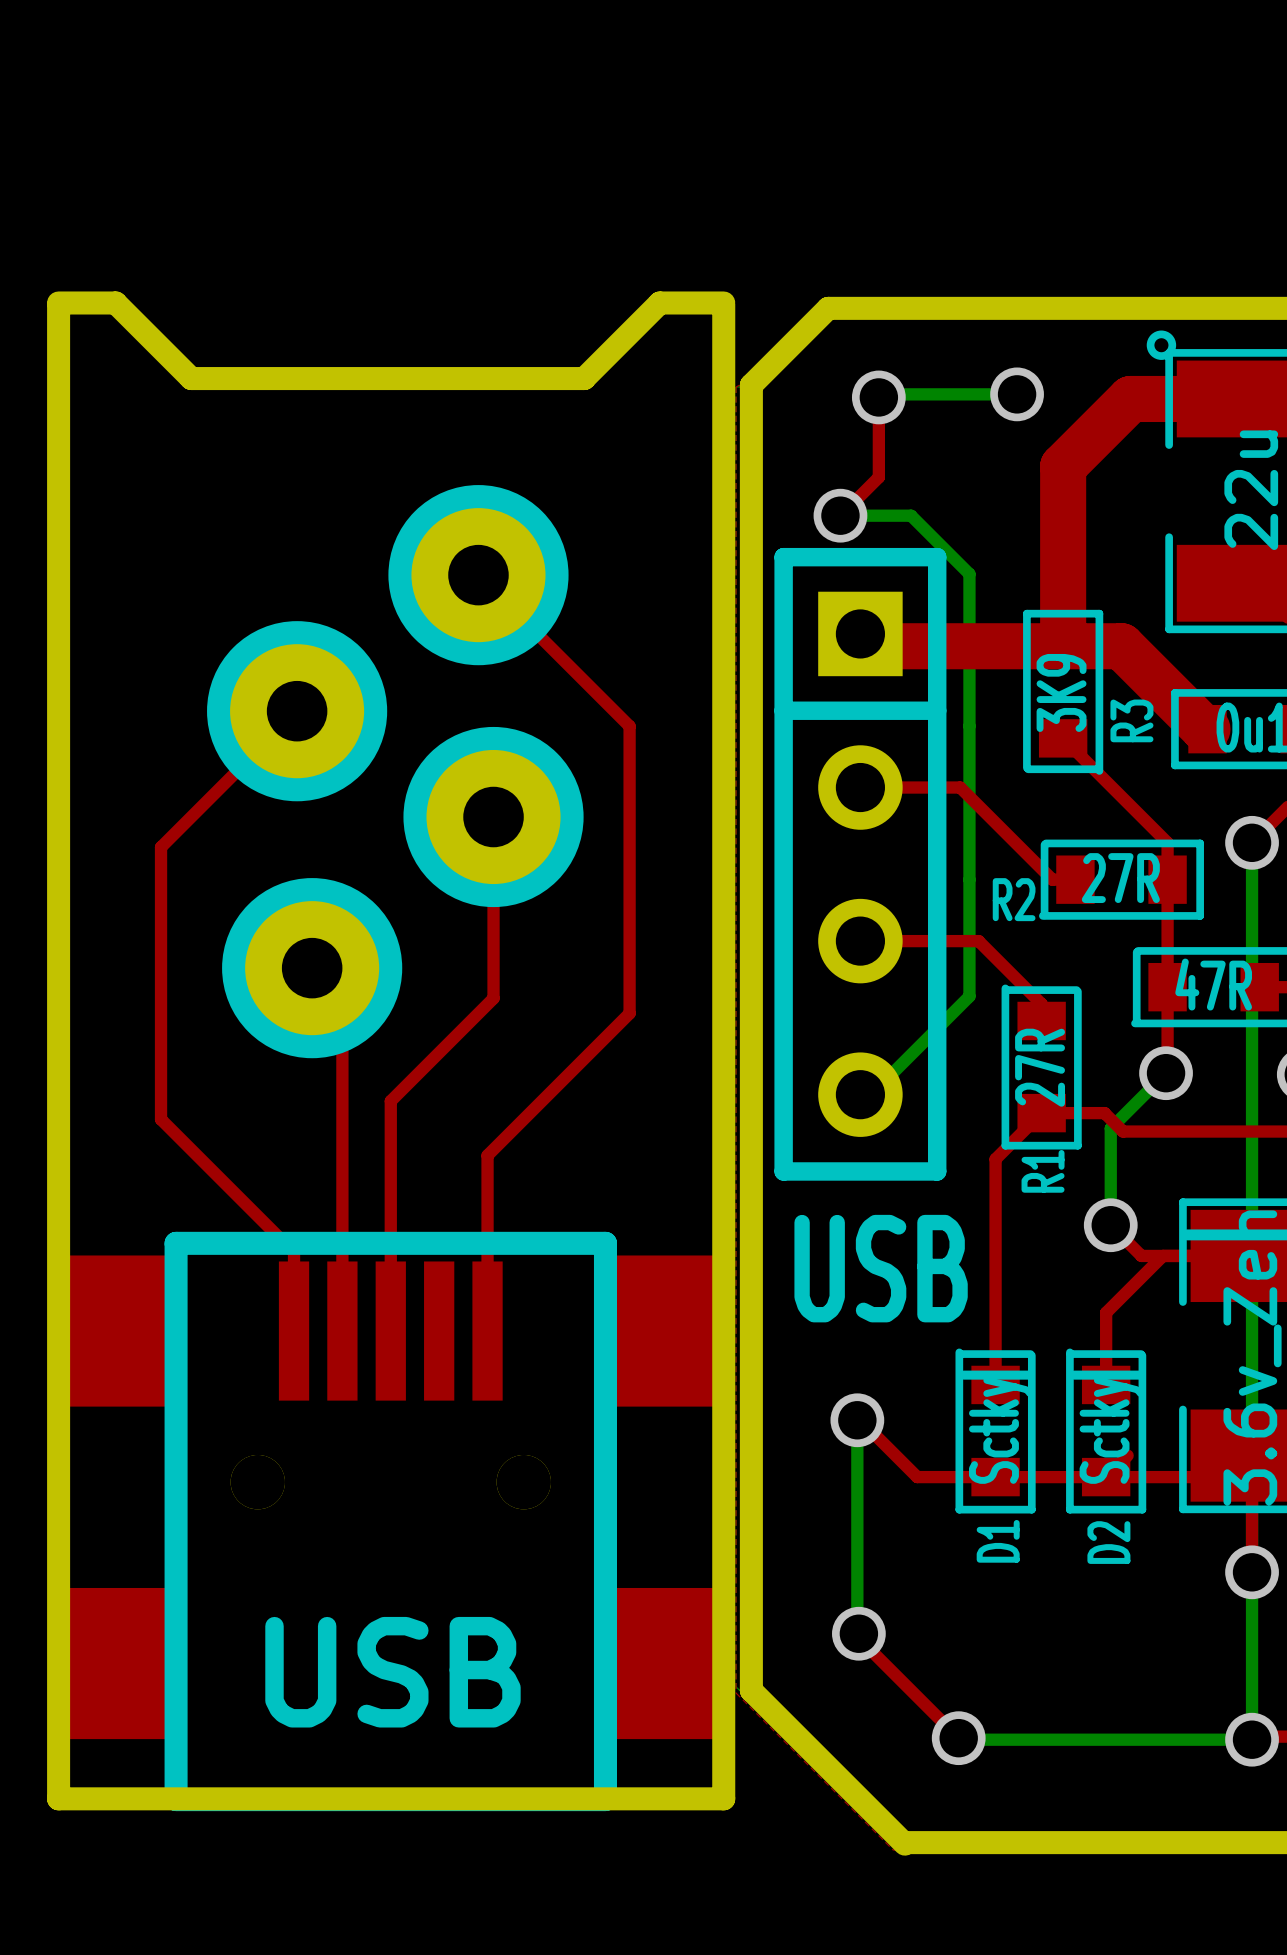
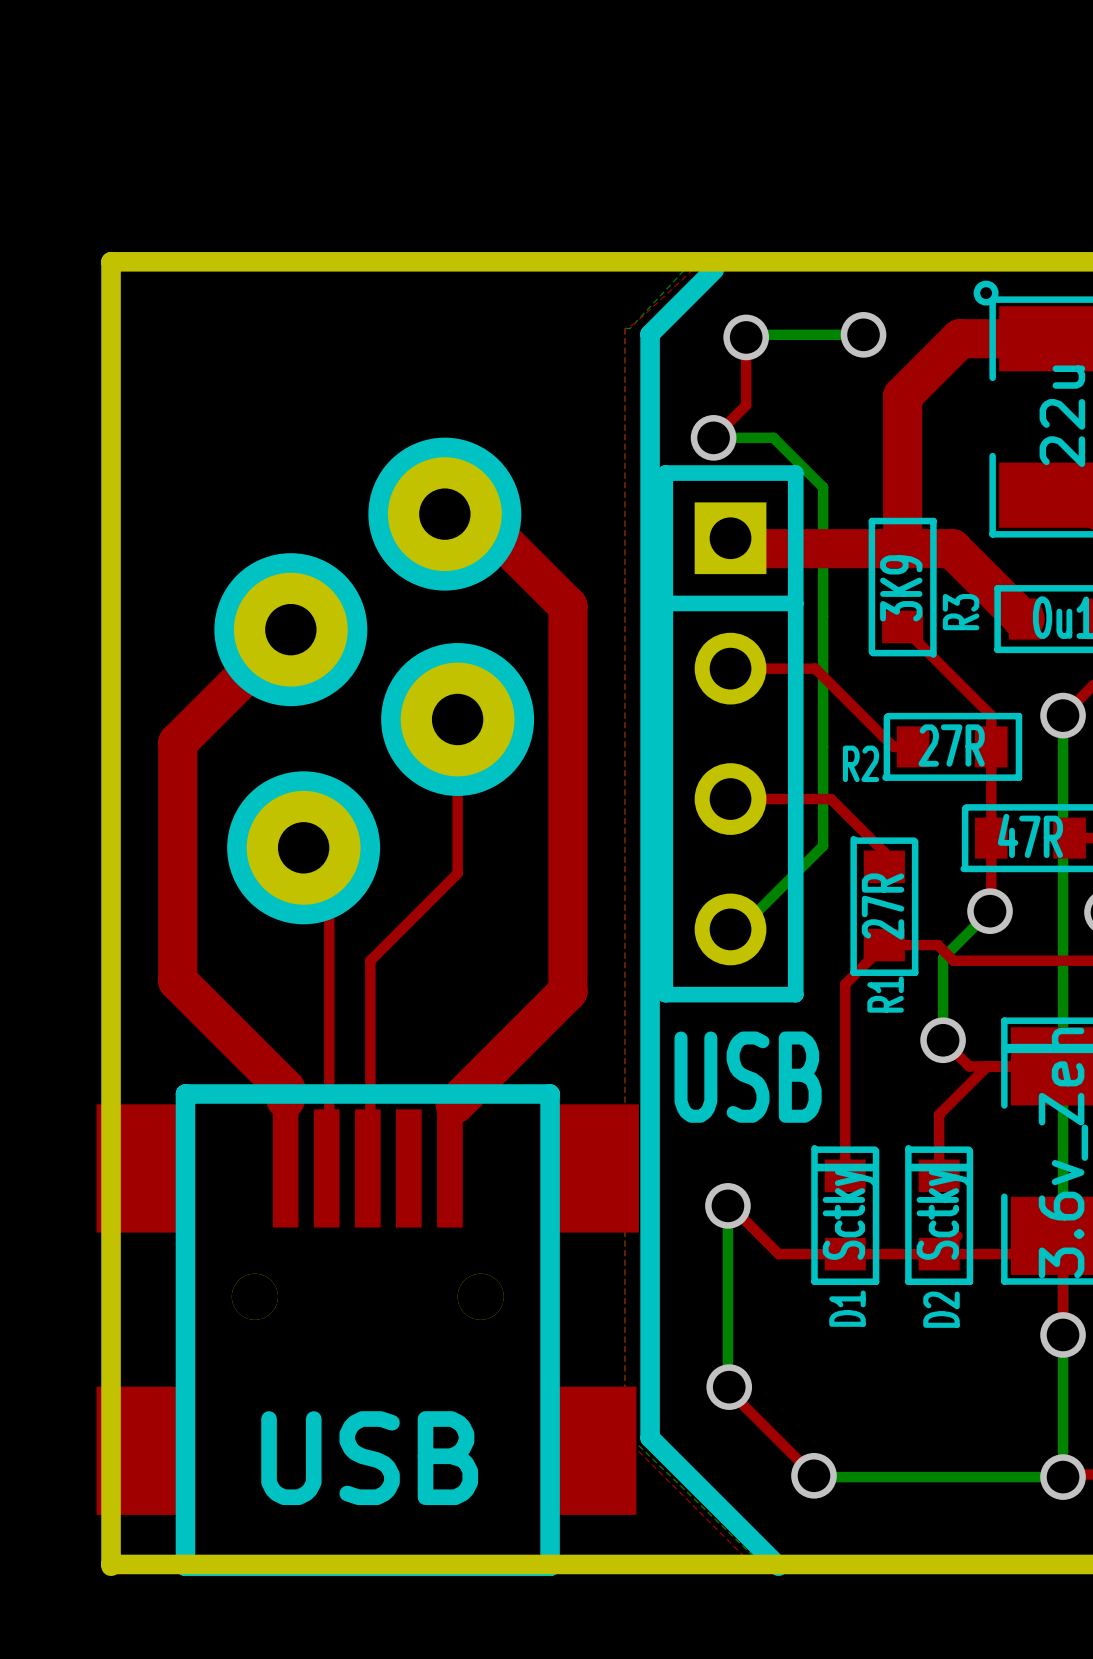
board edge: (58, 302) (115, 302) (191, 378) (584, 378) (659, 302) (723, 302) -> none
board edge: (58, 305) (58, 1798) (723, 1798) (723, 305) -> none
board edge: (828, 308) (751, 385) (751, 1690) (904, 1844) -> (703, 261) (111, 261) (111, 1566)
line: none -> (714, 270) (650, 334) (650, 1437) (778, 1566)
top track: (478, 575) (629, 726) (629, 1013) (487, 1155) (487, 1331) -> none
part position: (478, 575) -> (444, 514)
top track: none -> (444, 514) (475, 514) (567, 606) (567, 991) (455, 1104)
top track: (297, 711) (161, 847) (161, 1119) (294, 1252) (294, 1331) -> none
part position: (297, 711) -> (290, 629)
top track: none -> (290, 629) (177, 742) (177, 981) (285, 1088) (285, 1099)
top track: (493, 817) (493, 998) (390, 1101) (390, 1331) -> (457, 719) (457, 873) (370, 960) (370, 1155)
part position: (493, 817) -> (457, 719)
top track: (312, 968) (342, 998) (342, 1331) -> (303, 847) (329, 873) (329, 1155)
part position: (312, 968) -> (303, 847)
USB: (390, 1521) -> none
USB: none -> (367, 1330)
board edge: none -> (111, 1564) (768, 1564)

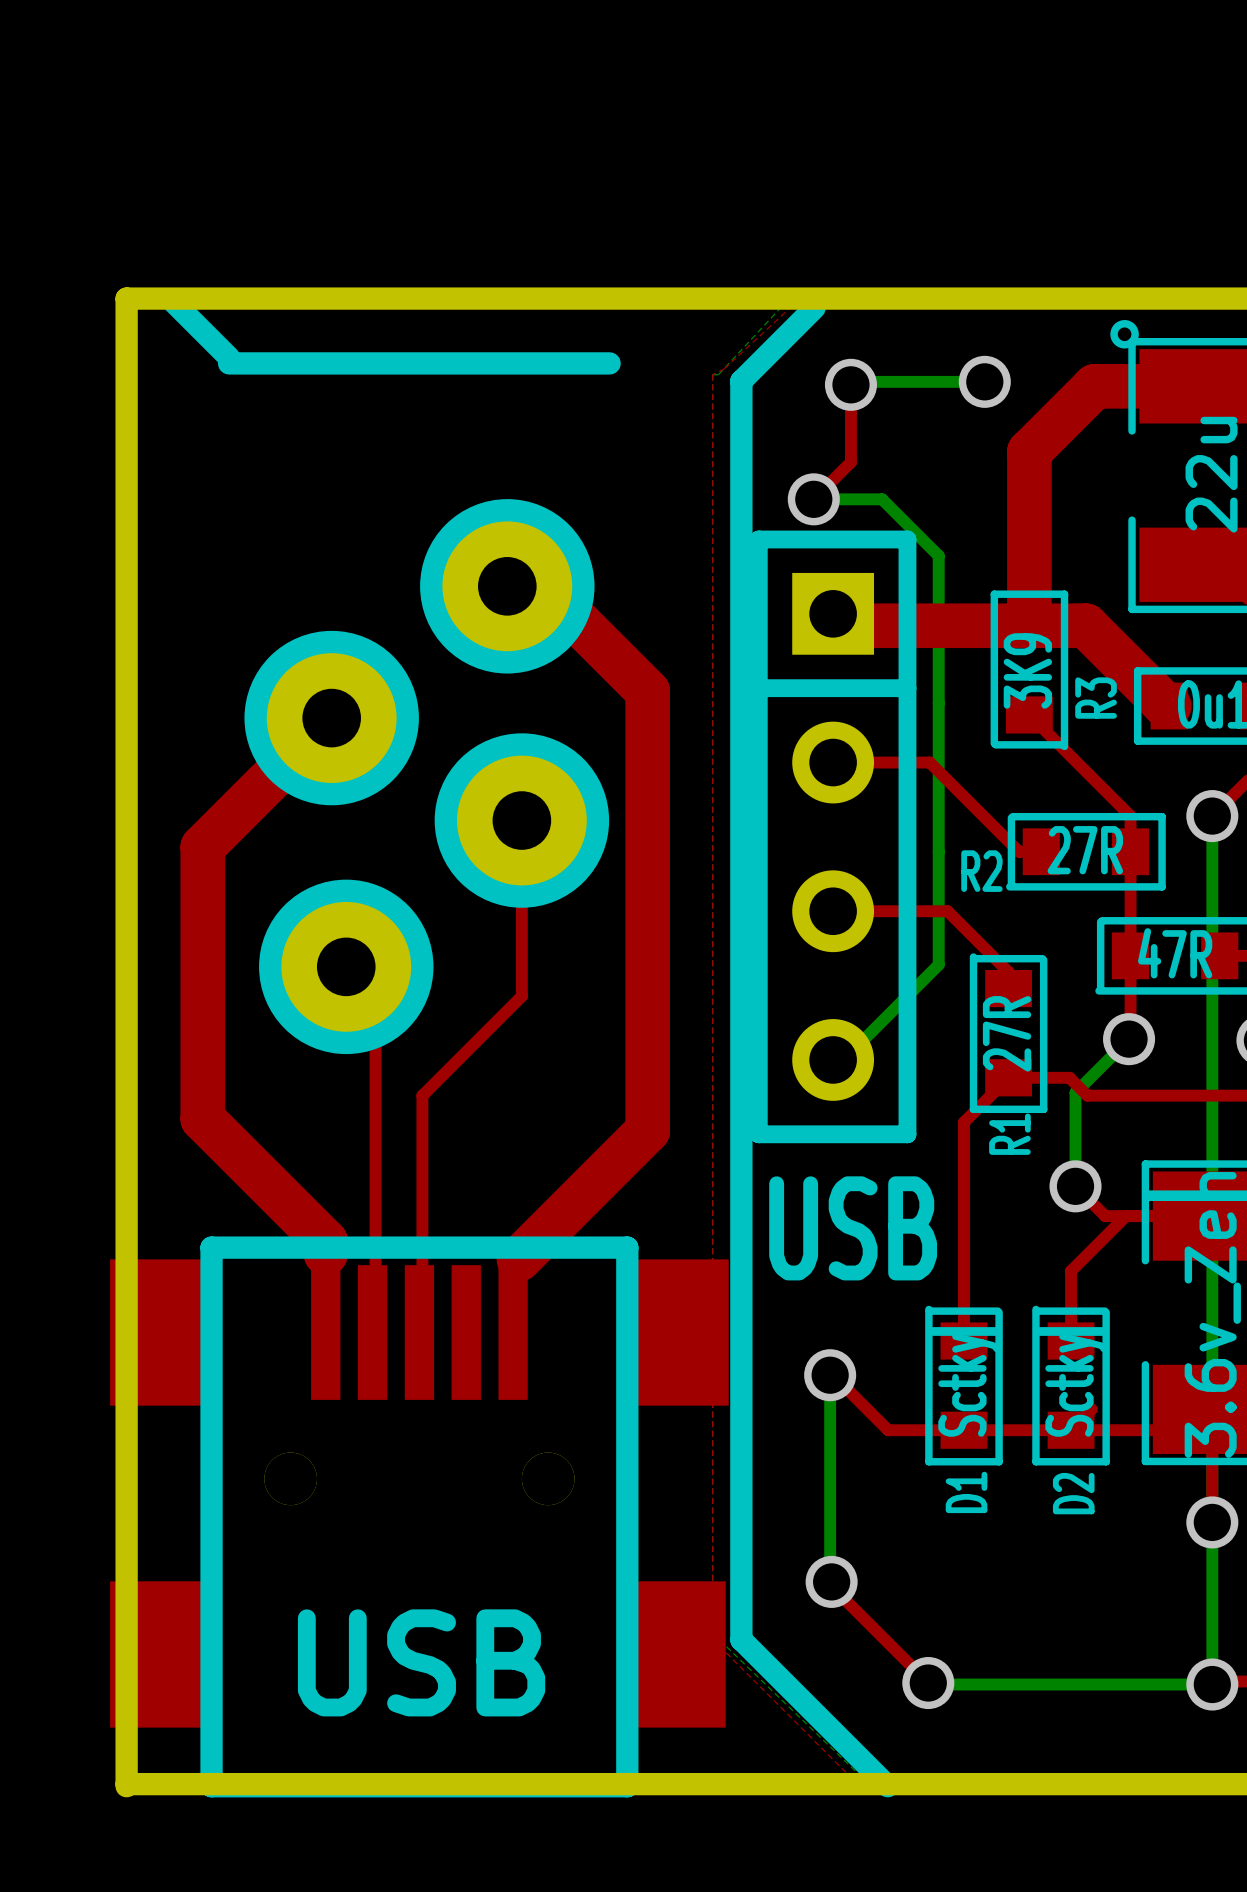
line: none -> (170, 299) (229, 357)
line: none -> (229, 363) (609, 363)

